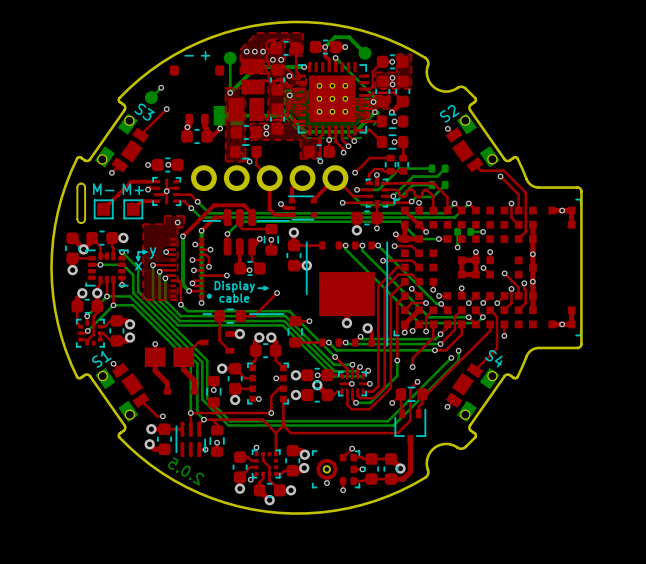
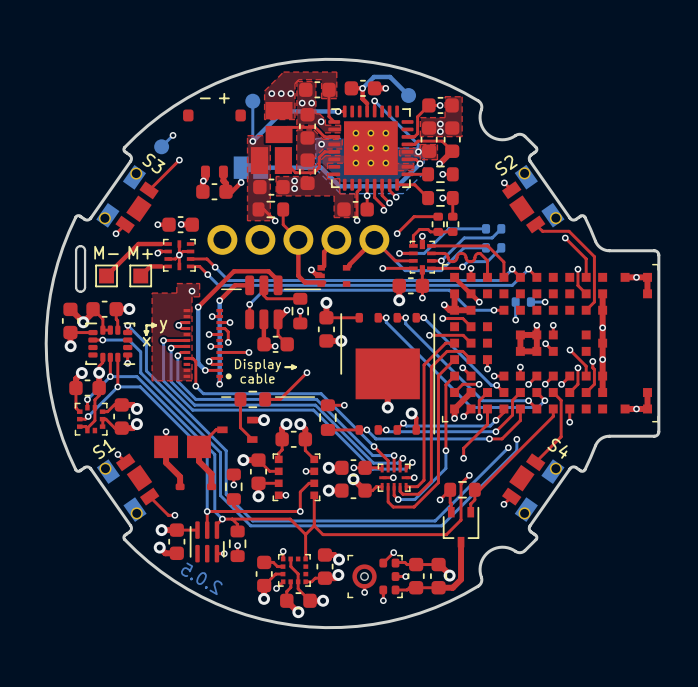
part footprint: [286, 195, 318, 221] -> [315, 264, 351, 287]

